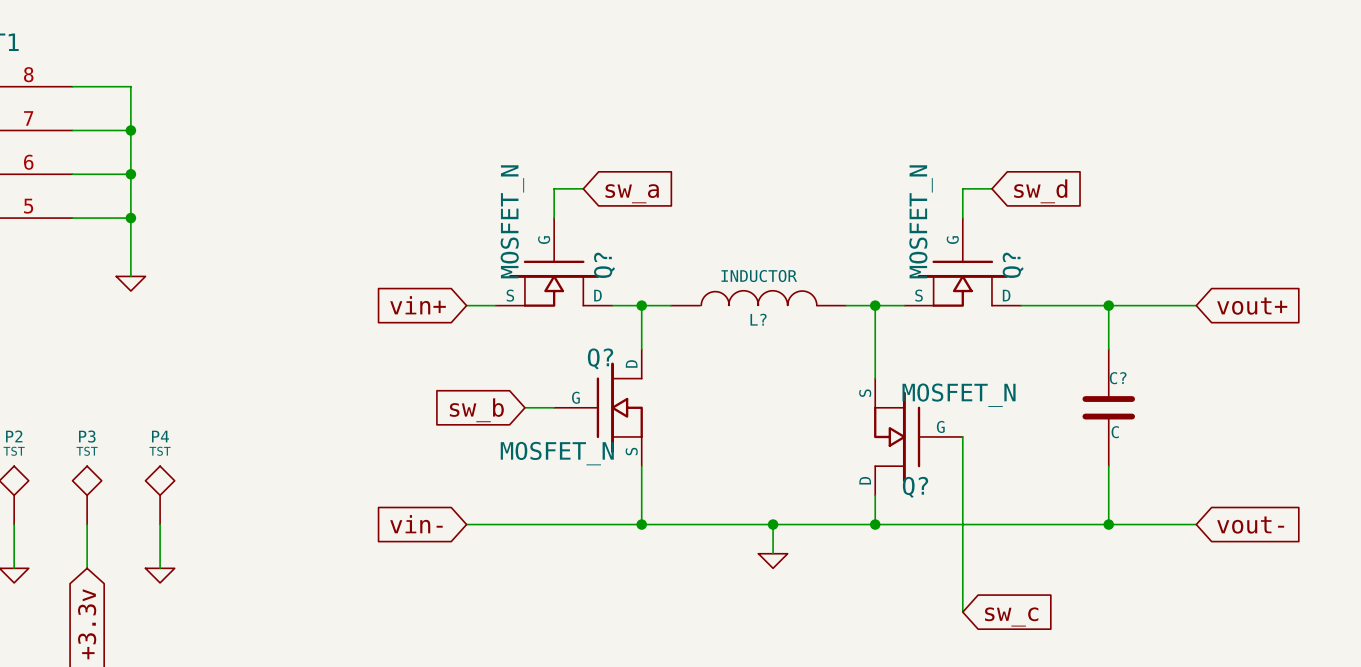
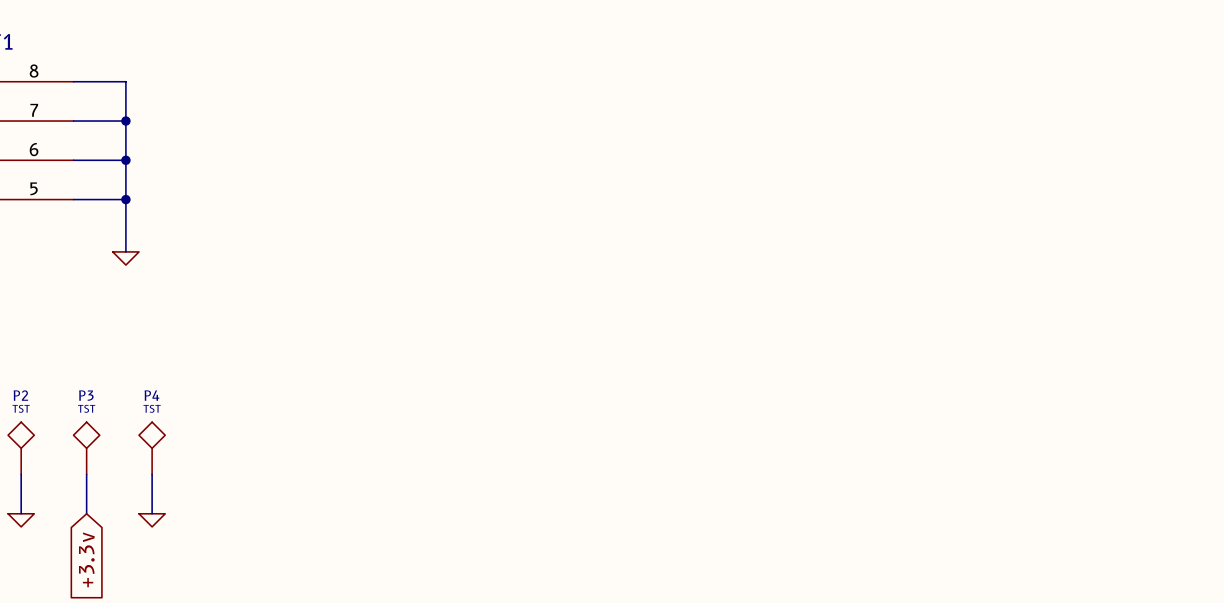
wire: (583, 188) (554, 188) (554, 218) -> none
wire: (991, 188) (962, 188) (962, 218) -> none
global label: sw_d (1040, 191) -> none
global label: sw_a (632, 193) -> none
Q?: MOSFET_N (554, 262) -> none
Q?: MOSFET_N (962, 262) -> none
L?: INDUCTOR (758, 298) -> none
global label: vin+ (418, 305) -> none
wire: (466, 305) (495, 305) -> none
wire: (612, 305) (670, 305) -> none
wire: (641, 305) (641, 349) -> none
junction: (641, 305) -> none
wire: (846, 305) (904, 305) -> none
wire: (875, 305) (875, 378) -> none
junction: (875, 305) -> none
wire: (1021, 305) (1196, 305) -> none
wire: (1108, 305) (1108, 349) -> none
junction: (1108, 305) -> none
global label: vout+ (1252, 306) -> none
wire: (524, 407) (554, 407) -> none
Q?: MOSFET_N (598, 407) -> none
C?: C (1108, 407) -> none
global label: sw_b (476, 410) -> none
Q?: MOSFET_N (918, 436) -> none
wire: (962, 436) (962, 612) -> none
wire: (641, 466) (641, 524) -> none
wire: (1108, 466) (1108, 524) -> none
wire: (875, 495) (875, 524) -> none
global label: vin- (416, 524) -> none
wire: (466, 524) (1196, 524) -> none
junction: (641, 524) -> none
wire: (773, 524) (773, 553) -> none
junction: (773, 524) -> none
junction: (875, 524) -> none
junction: (1108, 524) -> none
global label: vout- (1250, 525) -> none
power symbol: (773, 561) -> none
global label: sw_c (1011, 616) -> none

